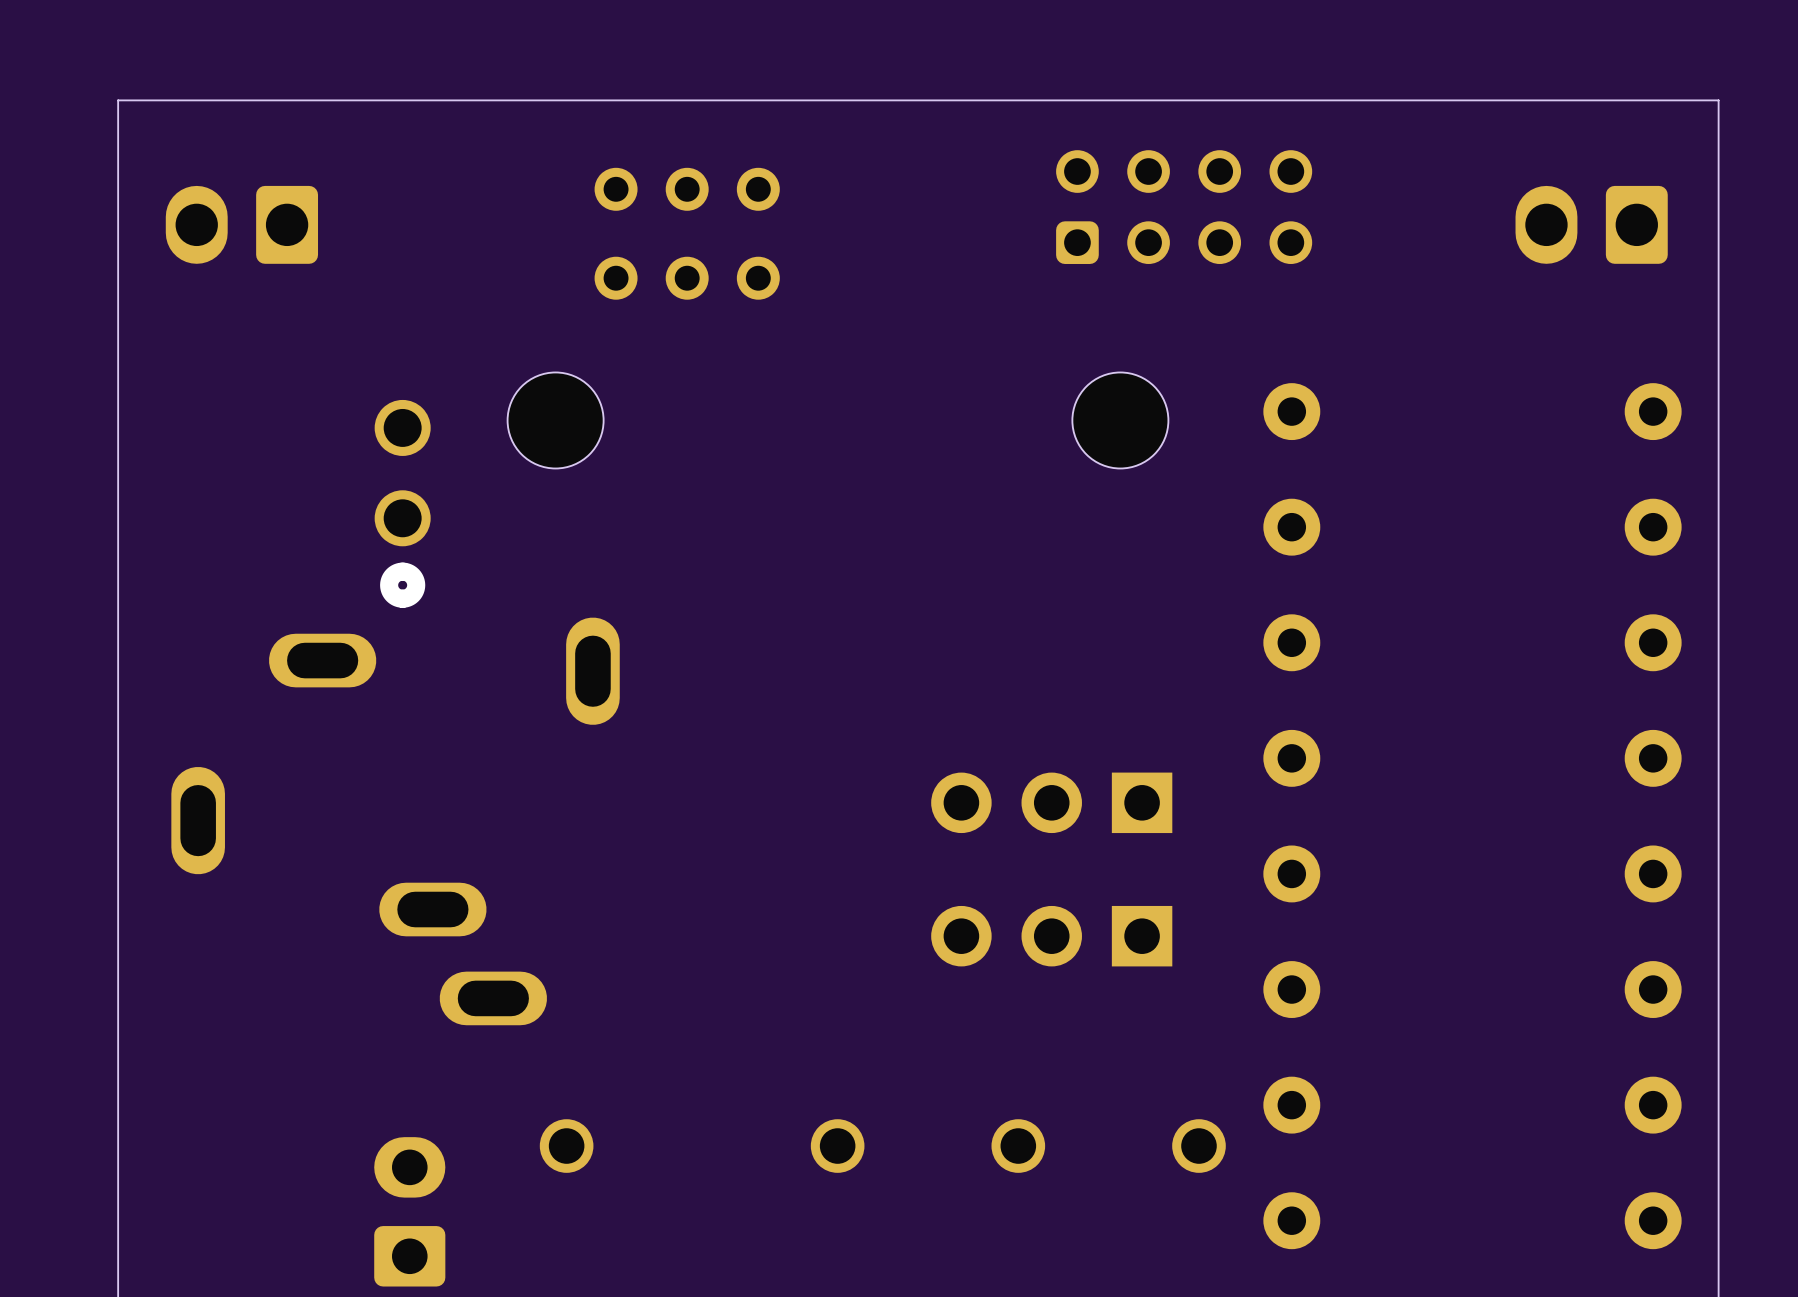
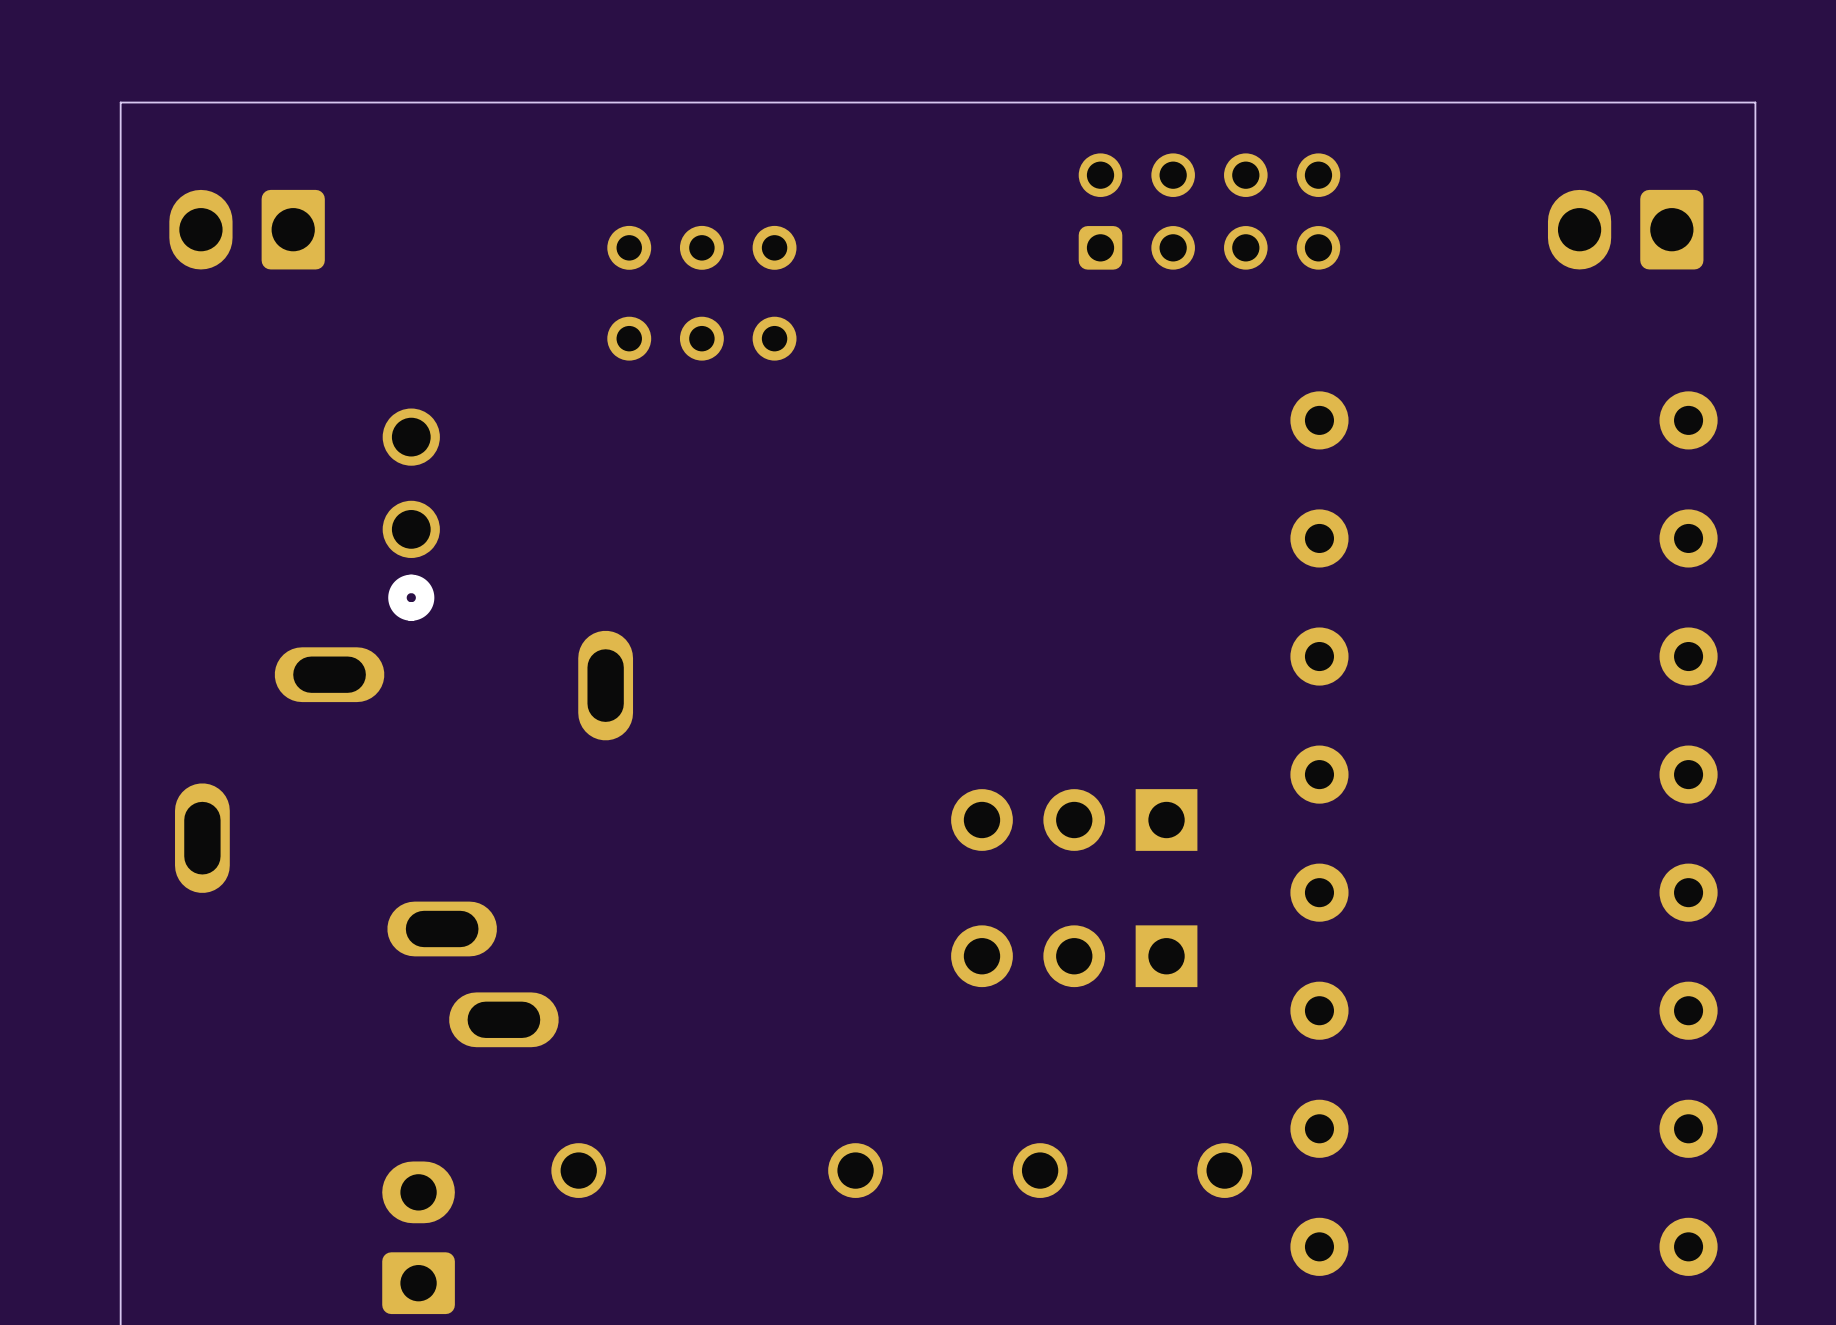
part position: (687, 233) -> (701, 293)
part: (555, 420) -> none
part: (1120, 420) -> none

